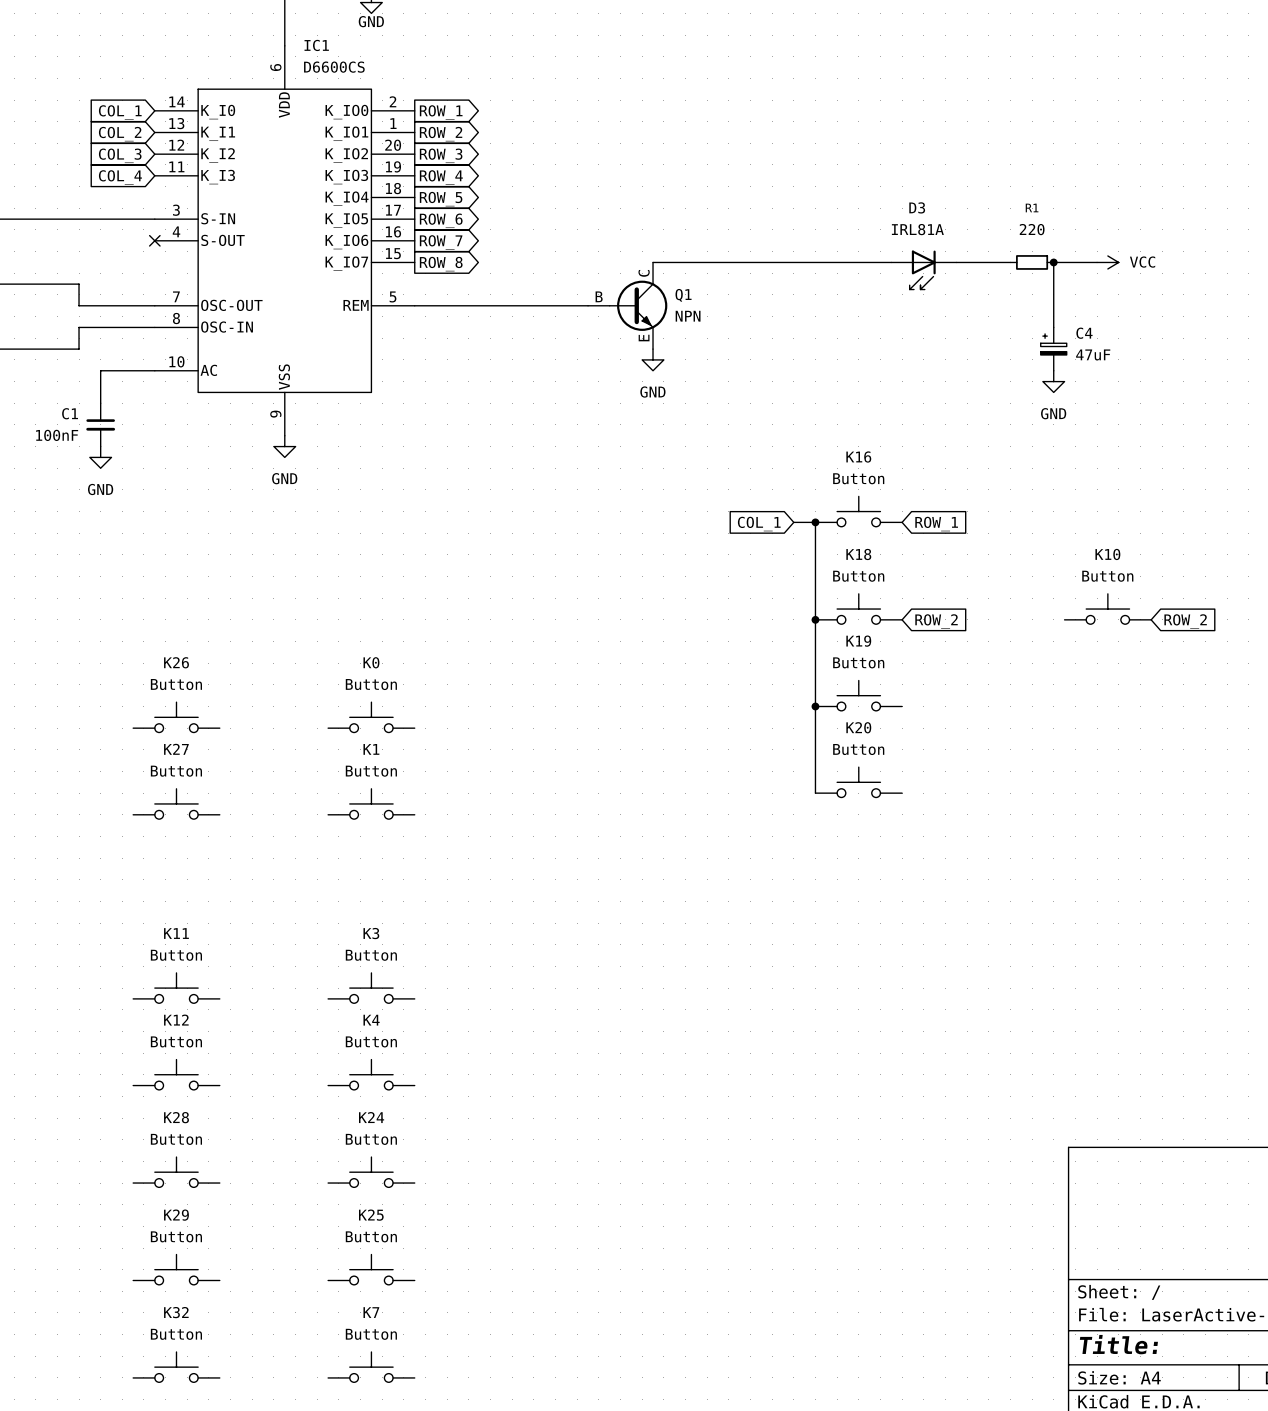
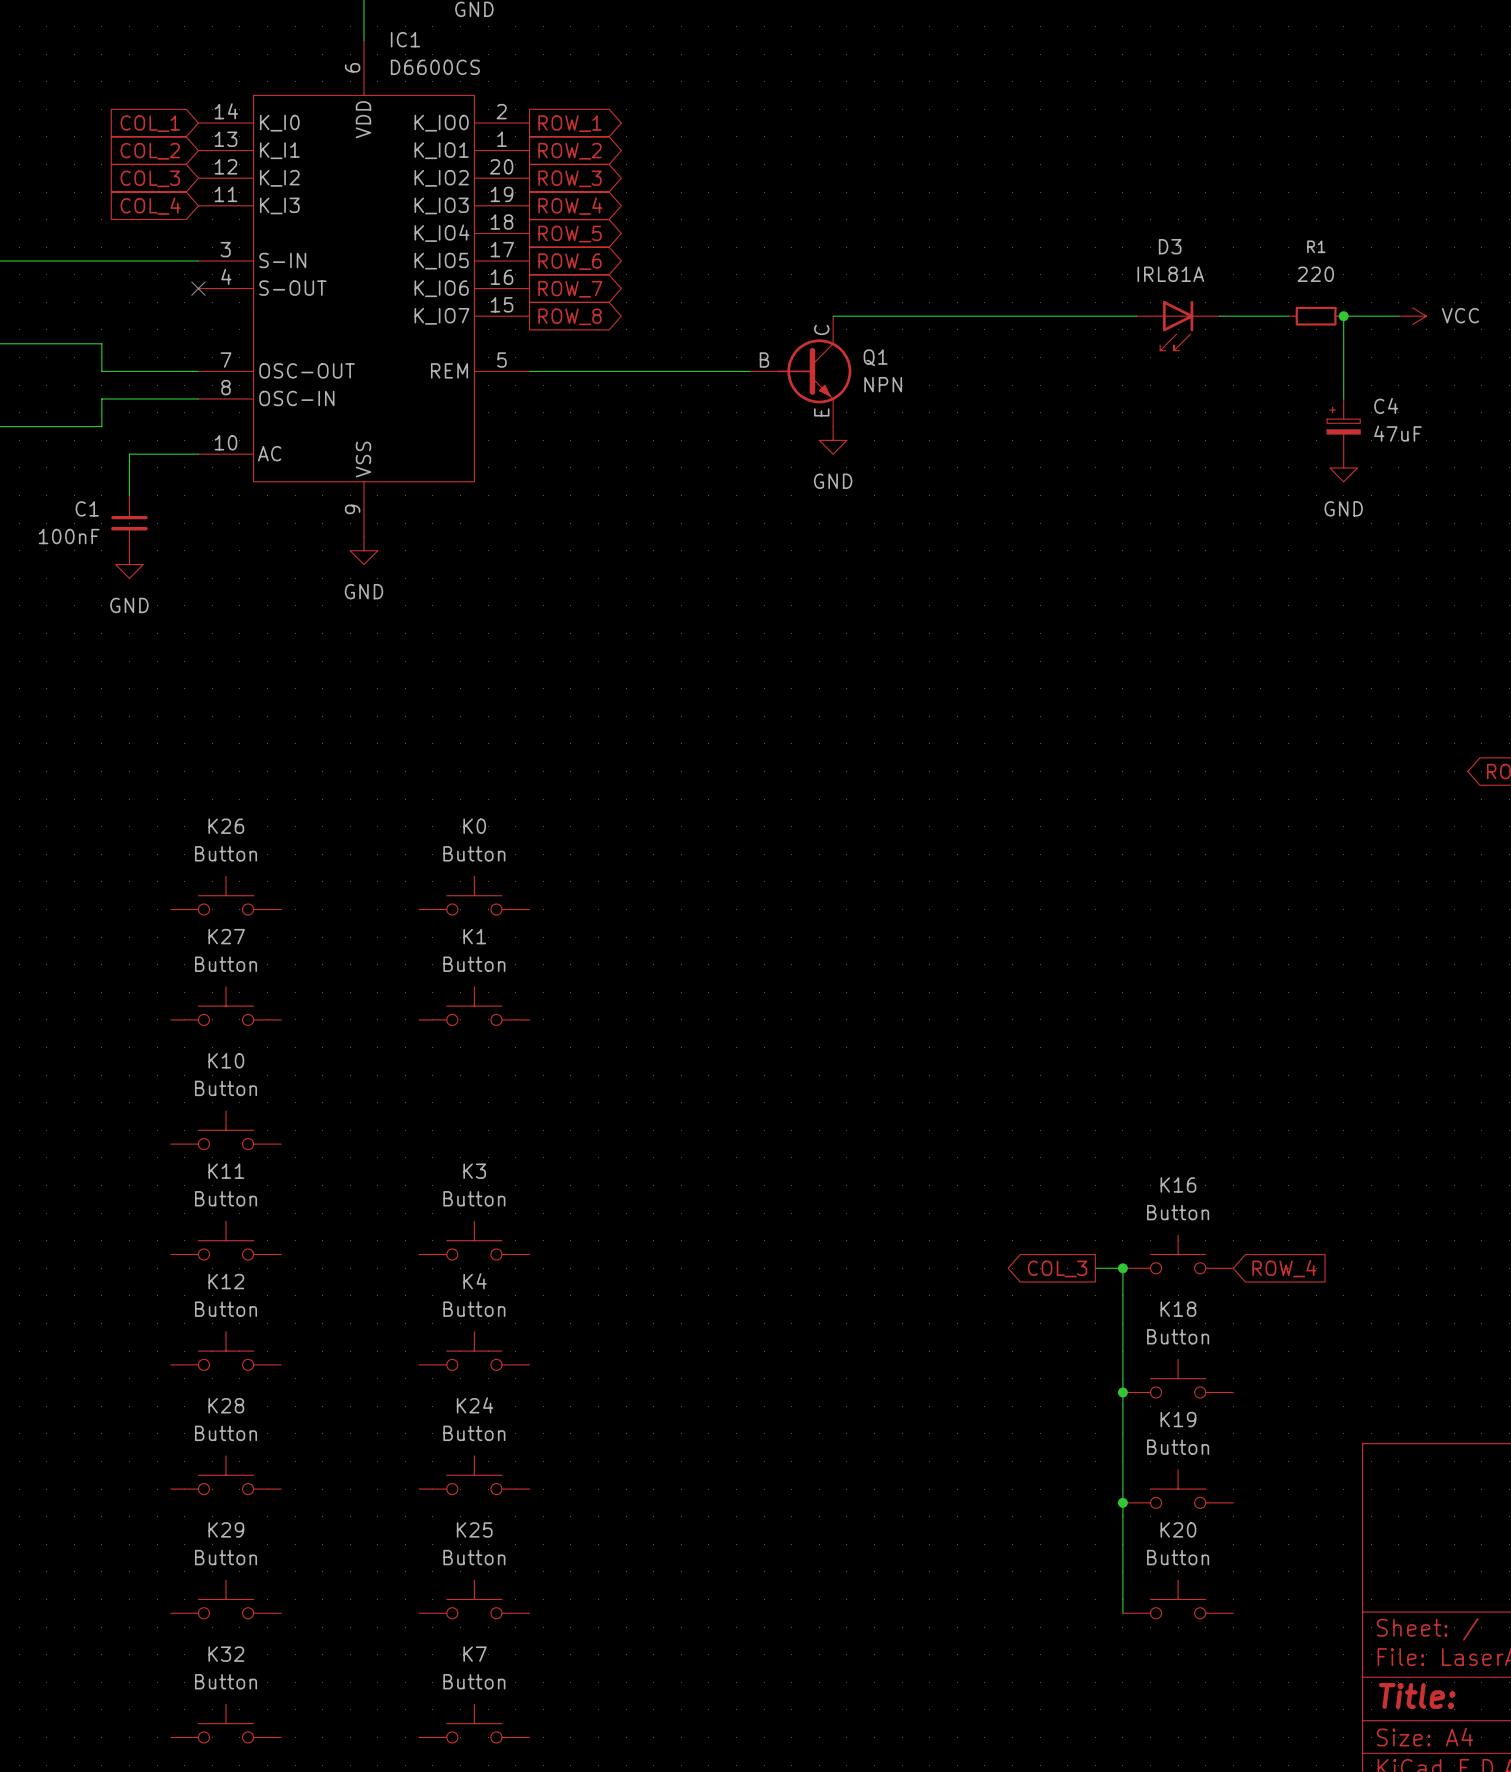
K16 position: (858, 511) -> (1178, 1254)
wire: (793, 522) (815, 522) (815, 793) -> none
junction: (815, 522) -> none
global label: COL_1 (759, 524) -> none
global label: ROW_1 (936, 524) -> none
K18 position: (858, 609) -> (1178, 1378)
K10 position: (1107, 609) -> (226, 1130)
junction: (815, 619) -> none
global label: ROW_2 (936, 621) -> none
K19 position: (858, 695) -> (1178, 1489)
junction: (815, 706) -> none
K20 position: (858, 782) -> (1178, 1599)
wire: none -> (1095, 1268) (1122, 1268) (1122, 1613)
junction: none -> (1122, 1268)
global label: none -> COL_3 (1057, 1268)
global label: none -> ROW_4 (1284, 1268)
junction: none -> (1122, 1392)
junction: none -> (1122, 1502)

